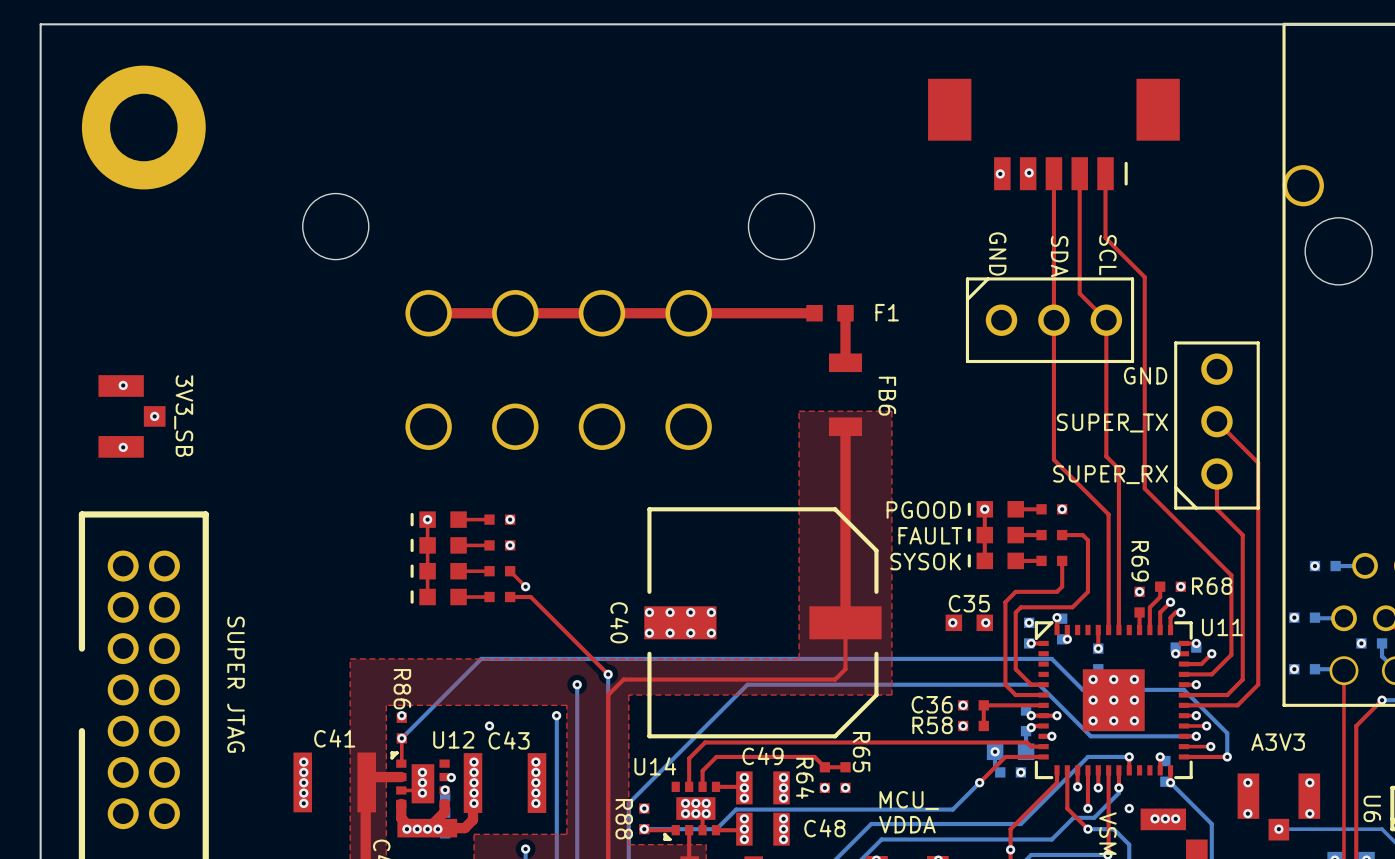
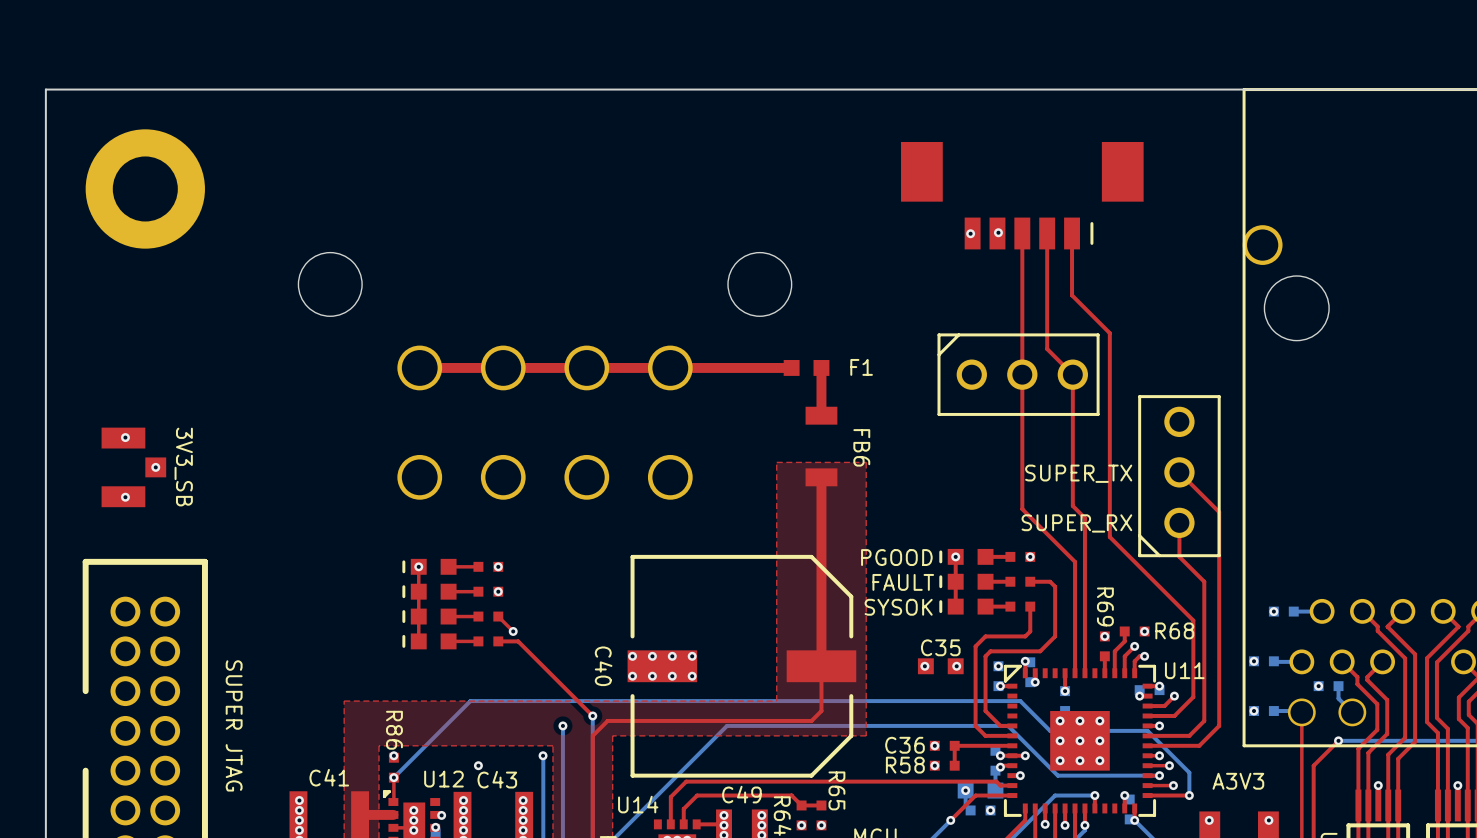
text: GND (997, 254) -> none
text: SCL (1107, 255) -> none
text: SDA (1059, 256) -> none
text: GND (1145, 375) -> none

